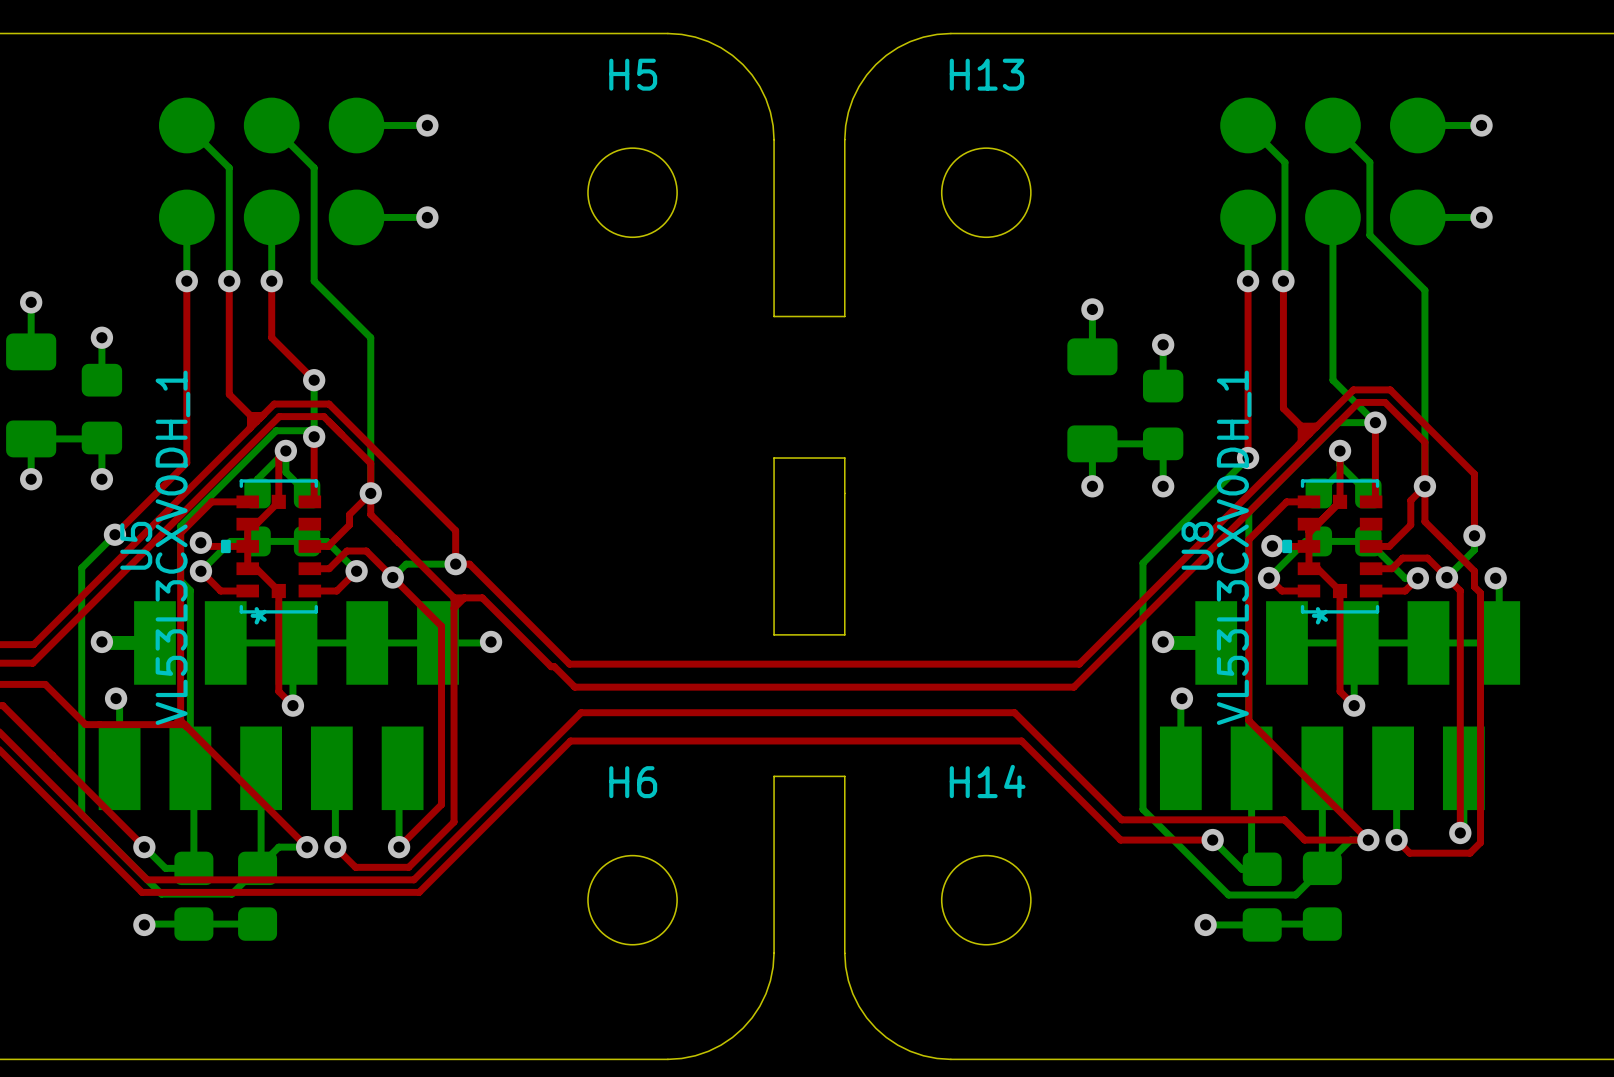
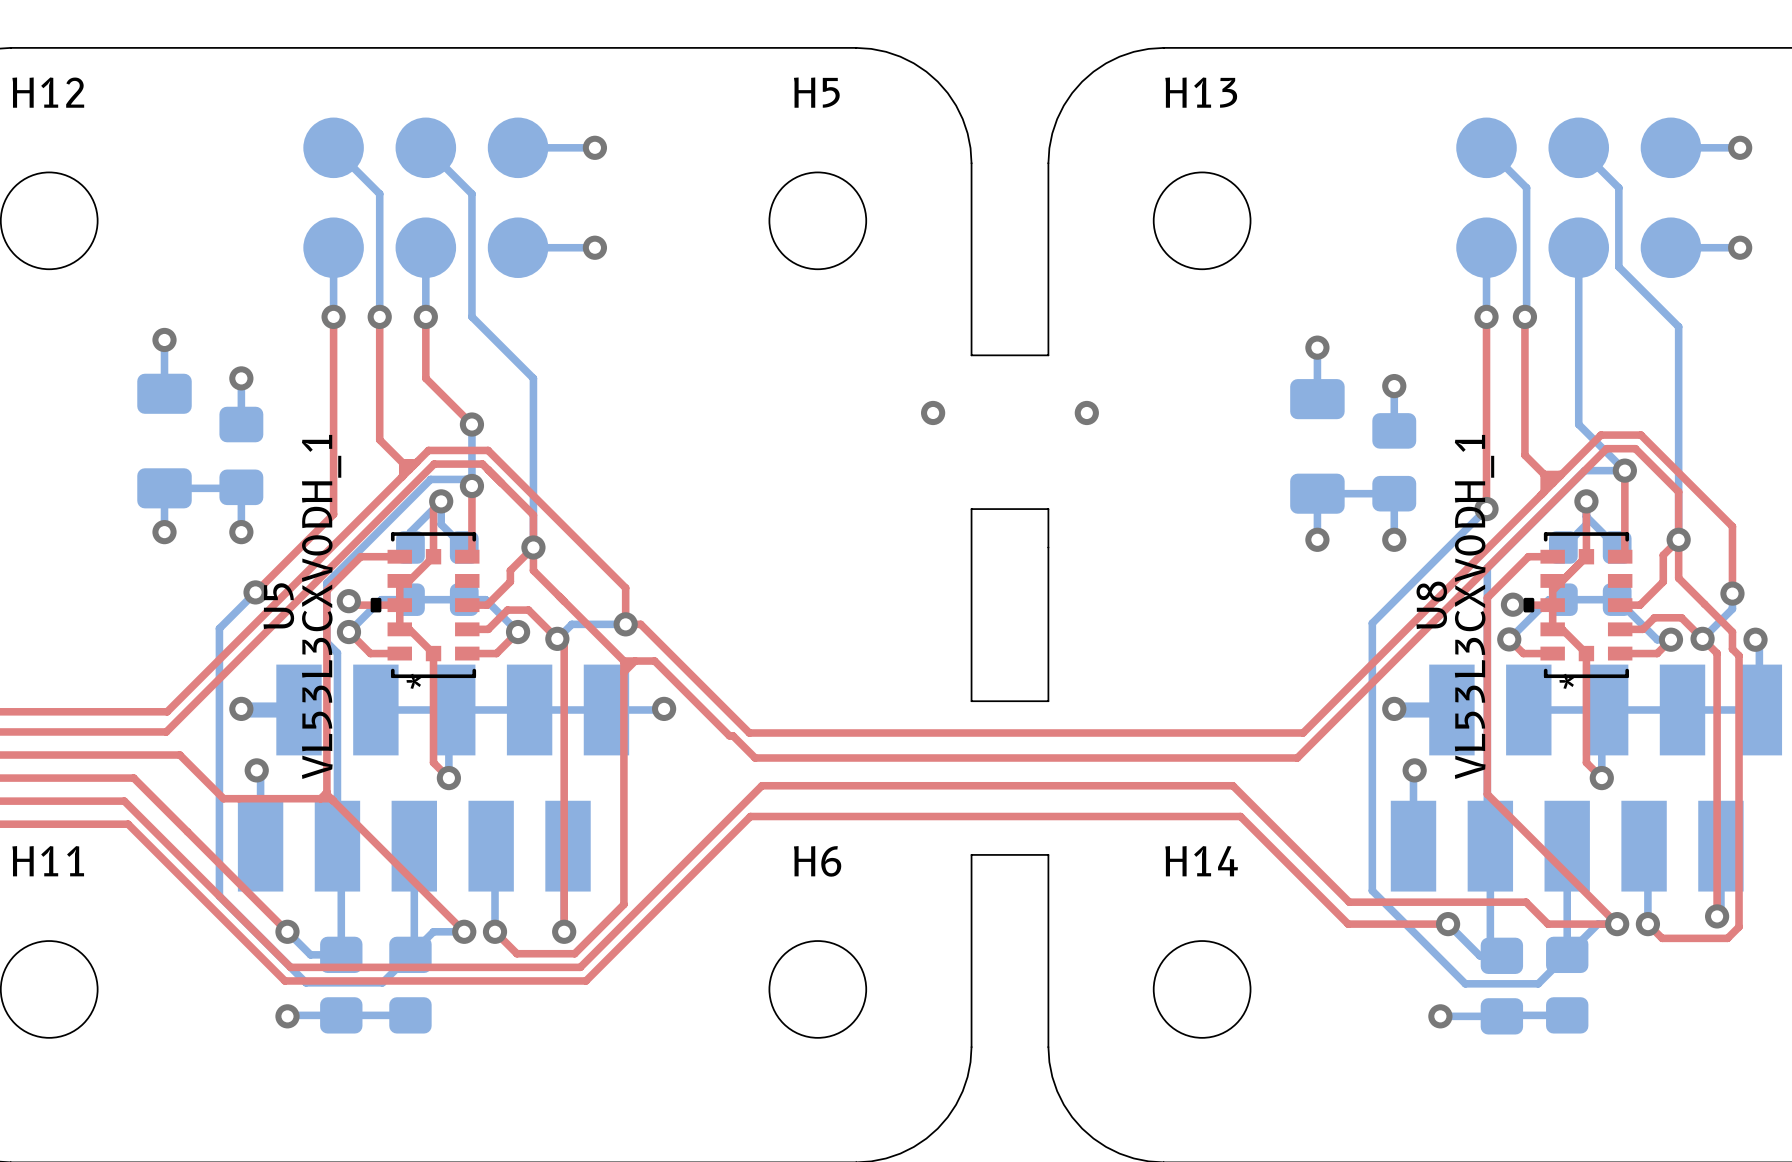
via: none -> (933, 412)
via: none -> (1086, 412)
top track: (399, 583) (441, 626) (441, 804) (399, 847) -> (564, 645) (564, 931)

